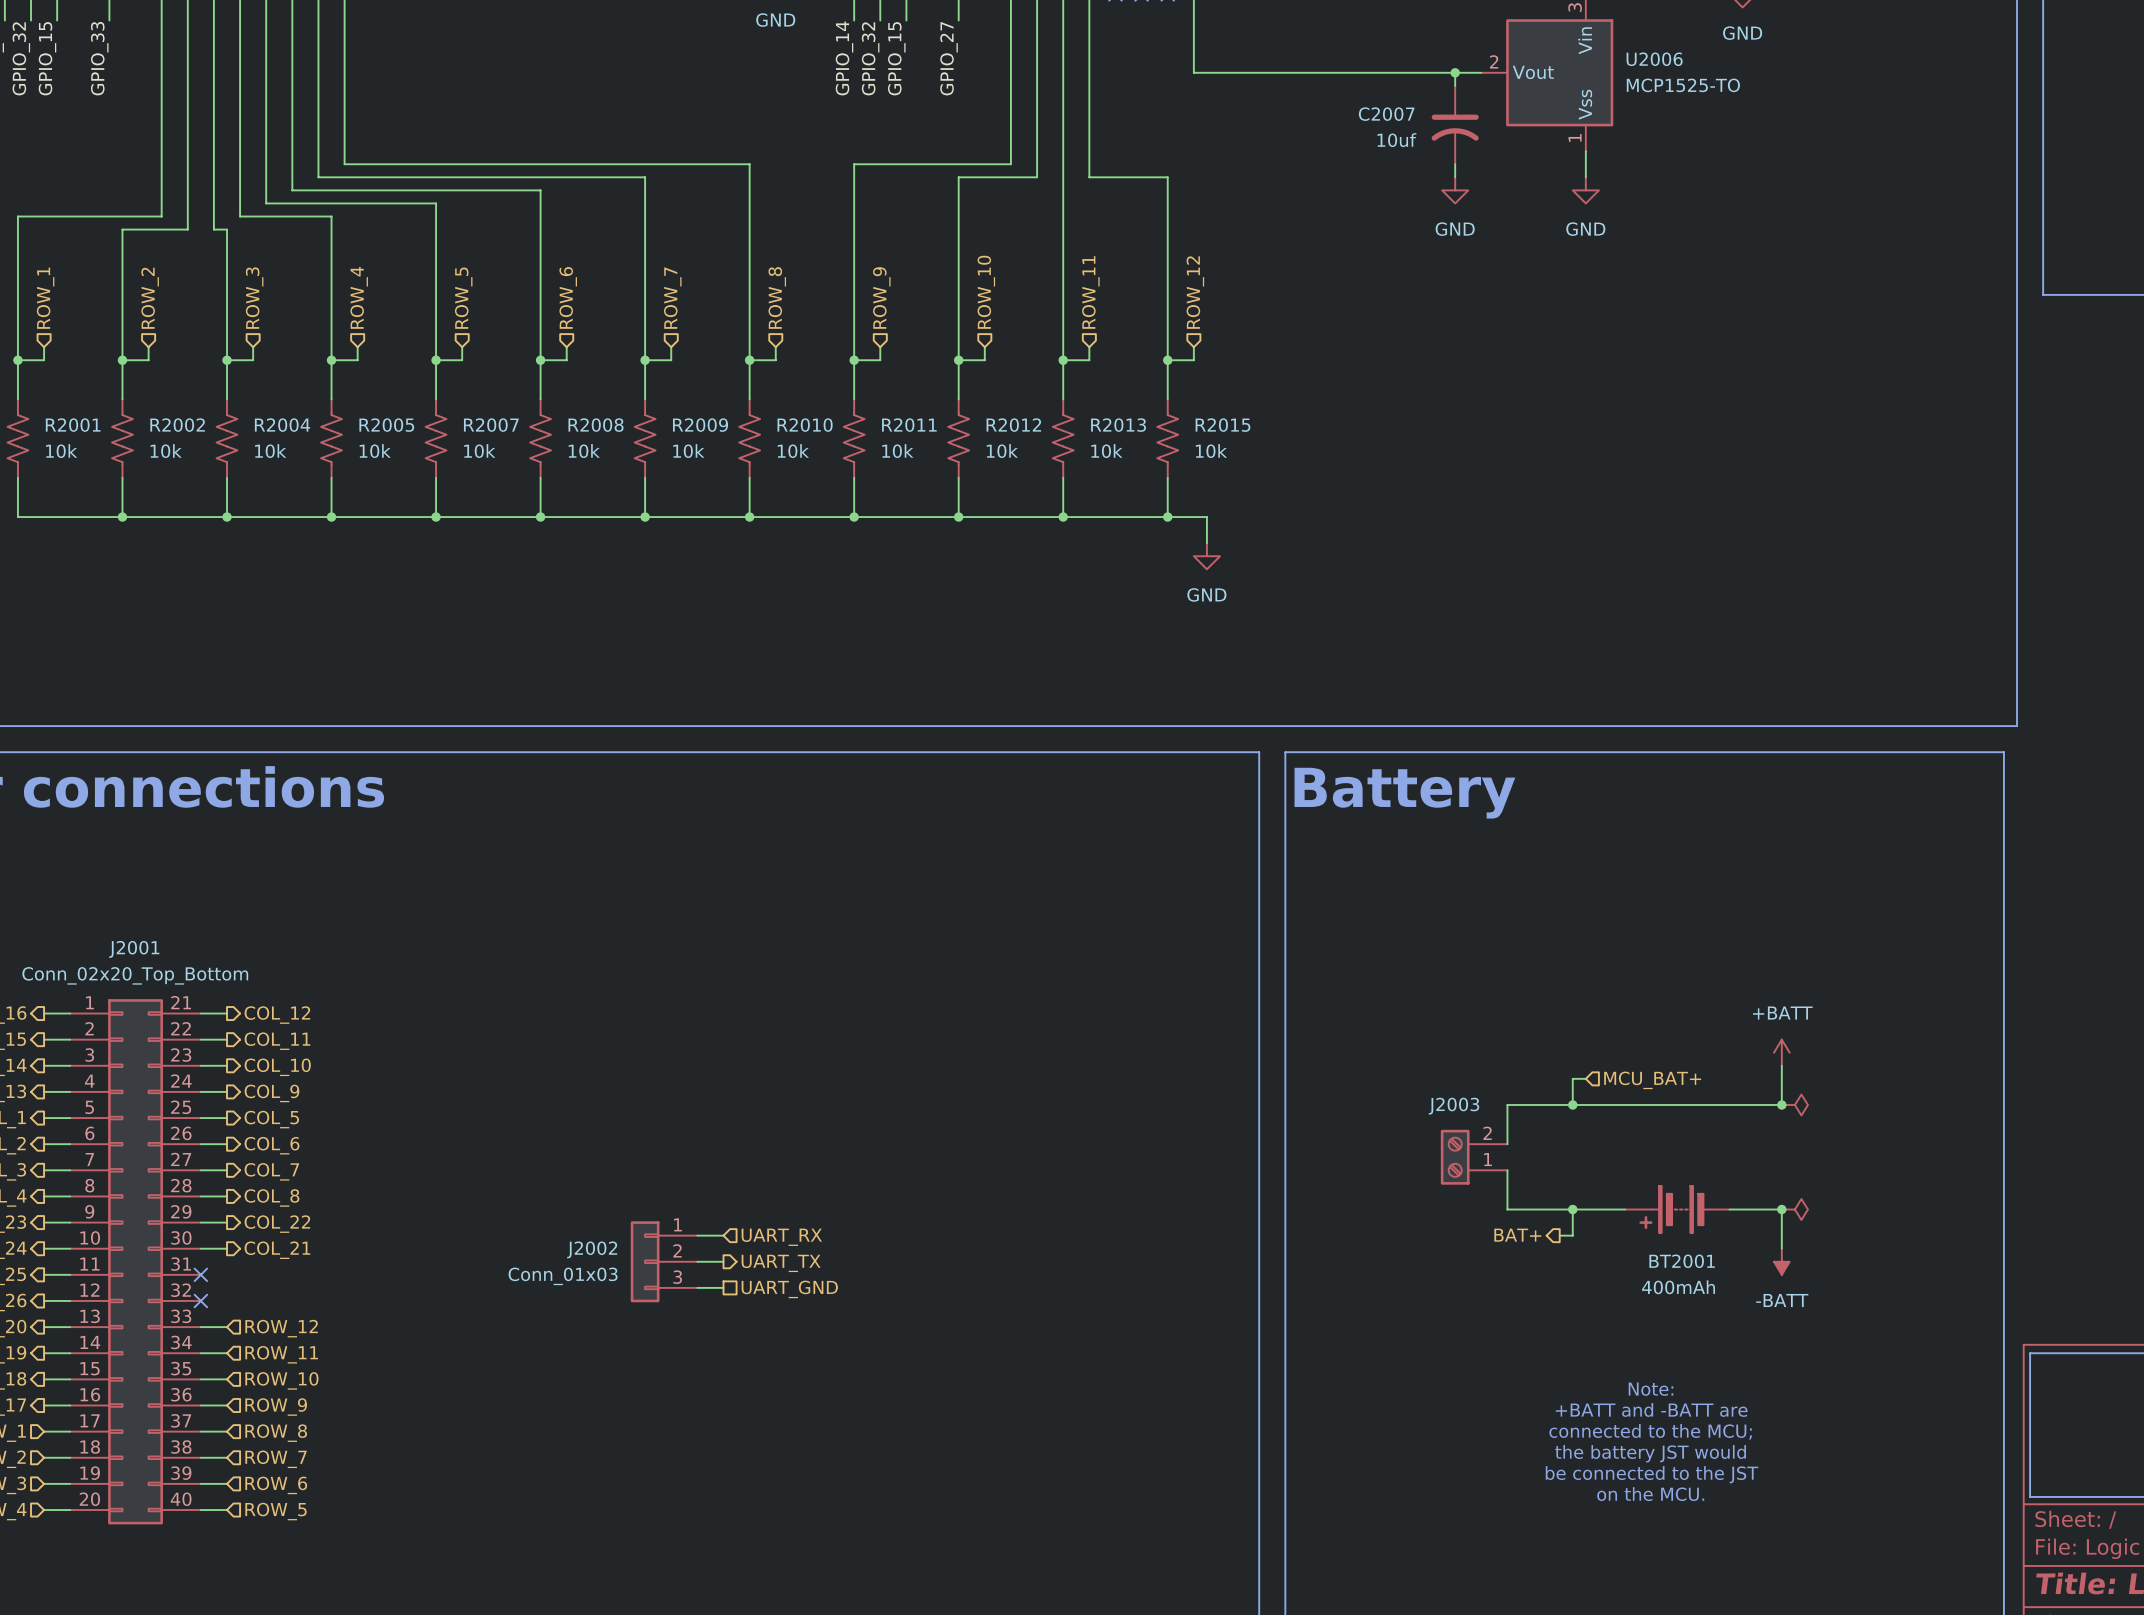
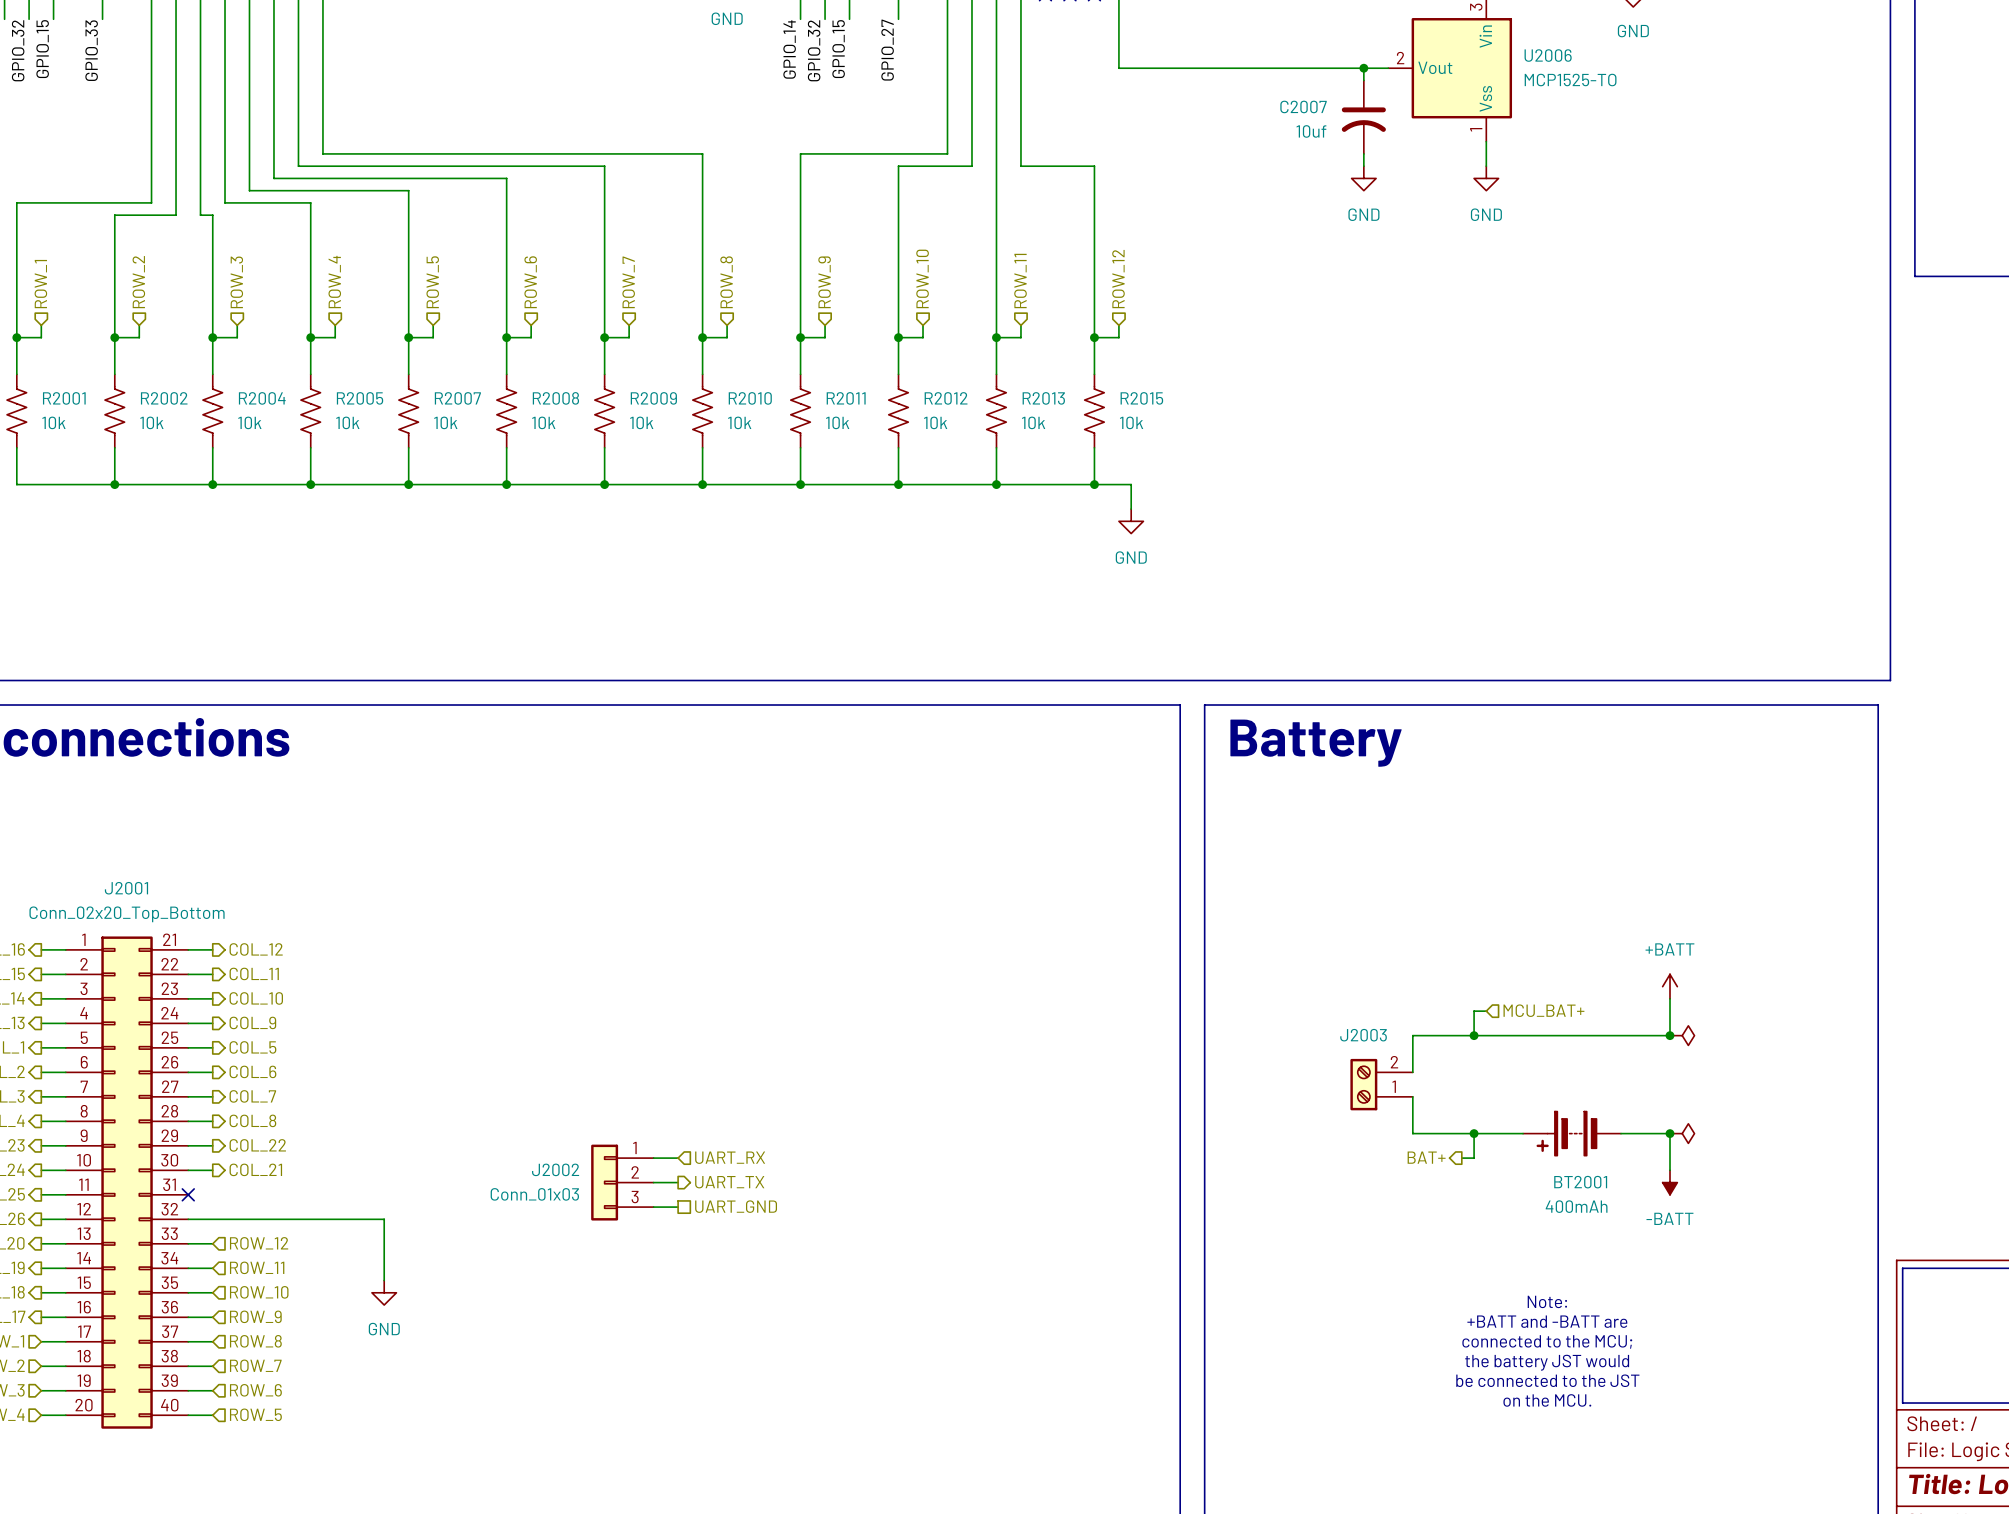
wire: none -> (188, 1219) (384, 1219) (384, 1280)
no-connect mark: (200, 1300) -> none
power symbol: none -> GND (384, 1292)

